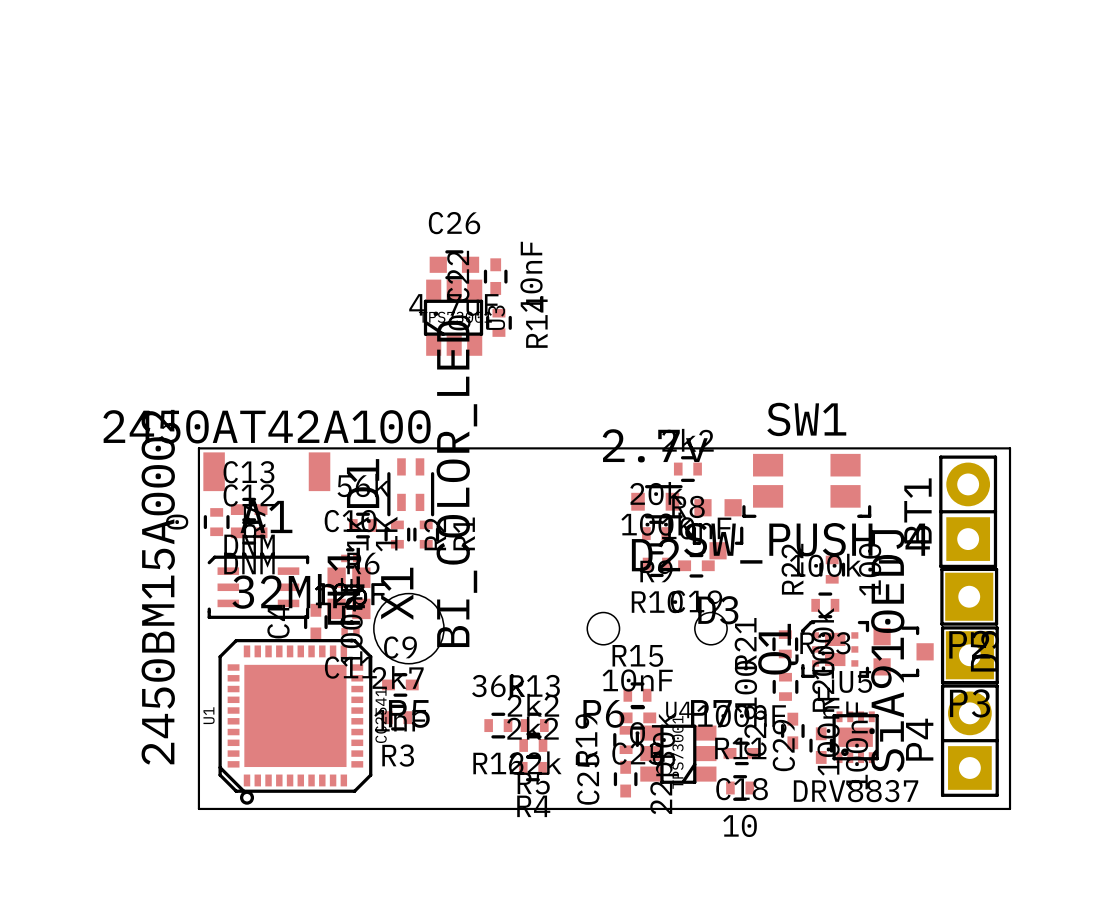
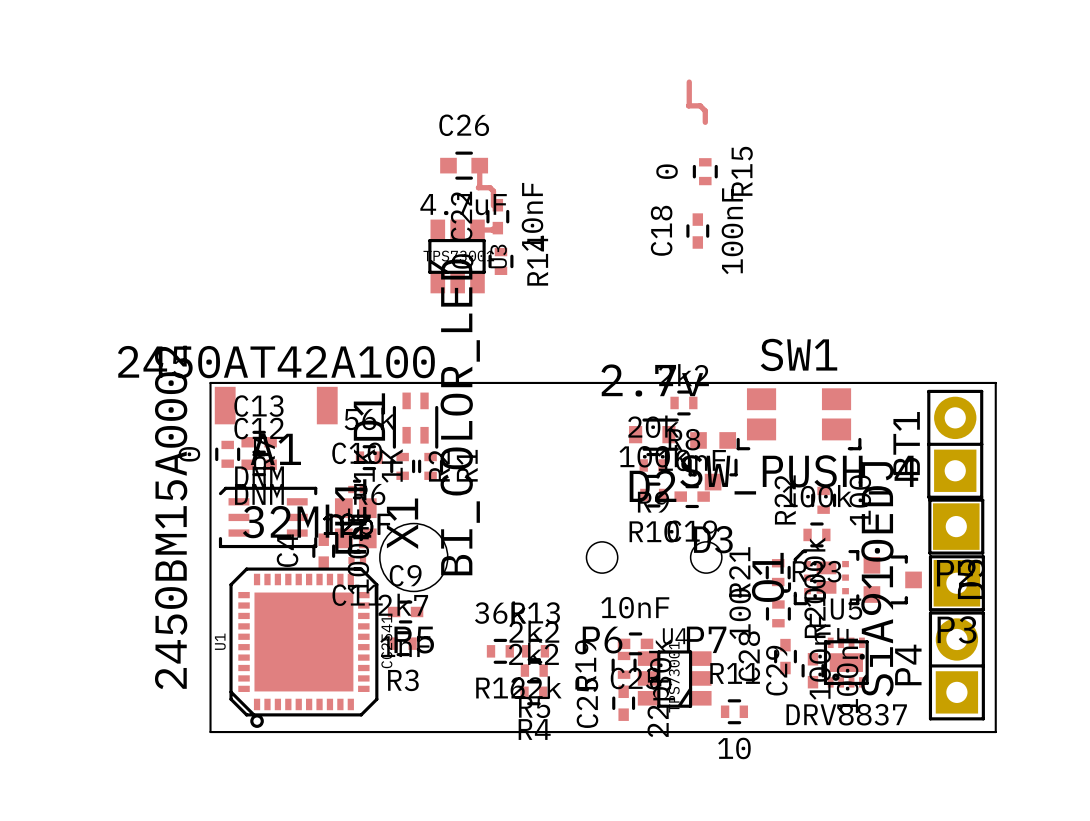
track: none -> (689, 82) (688, 105) (700, 105) (705, 110) (705, 122)
track: none -> (479, 165) (478, 187) (490, 187) (493, 191) (493, 205)
C26 position: (454, 264) -> (464, 165)
track: none -> (493, 228) (477, 229)
R15 rotation: 0° (637, 695) -> 90° clockwise (705, 171)
R15 position: (637, 695) -> (705, 171)
C18 rotation: 0° (741, 753) -> 90° clockwise (697, 231)
C18 position: (741, 753) -> (697, 231)

